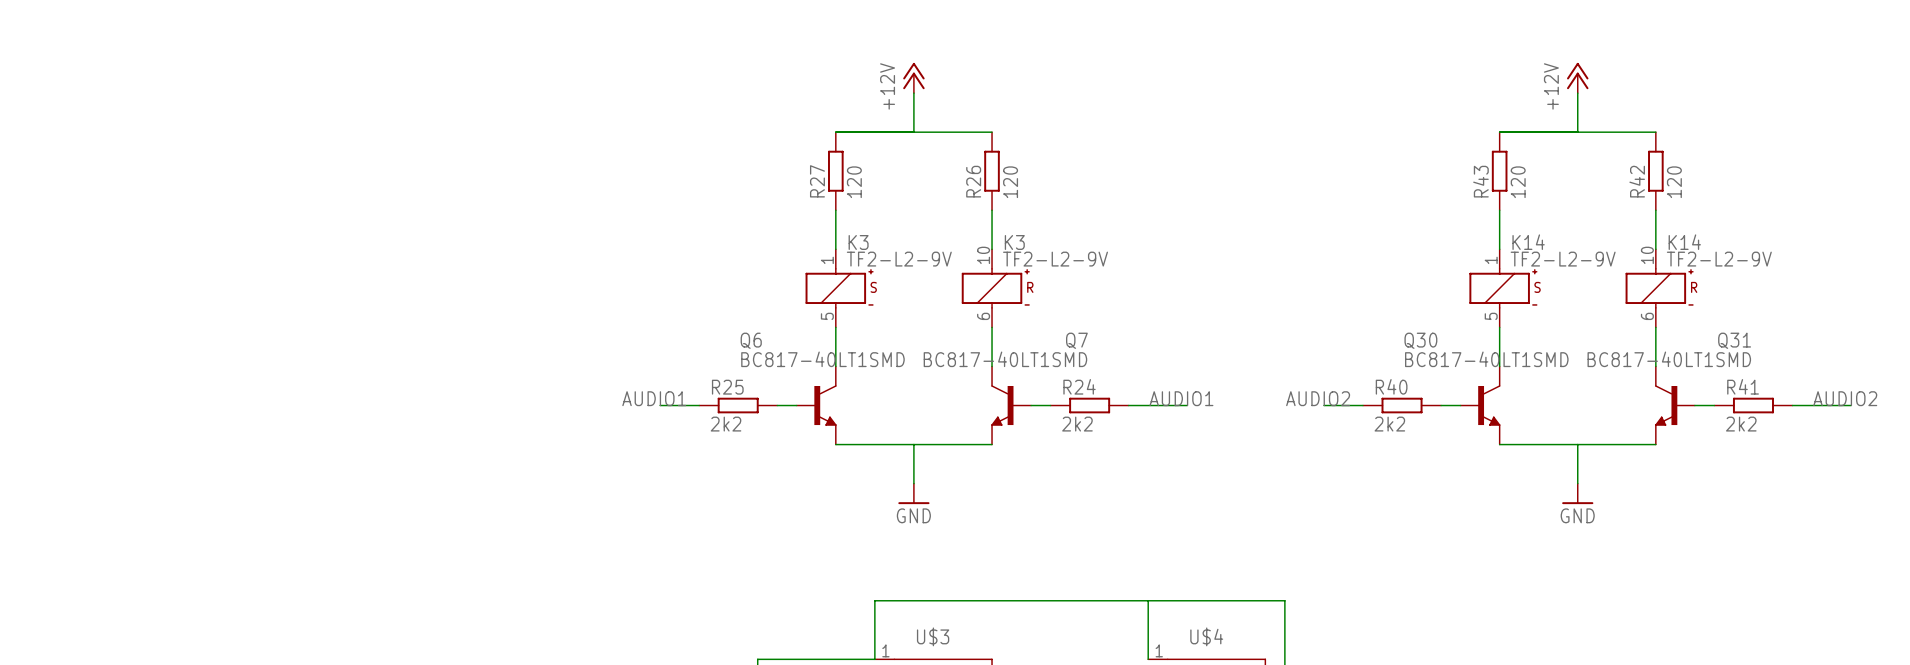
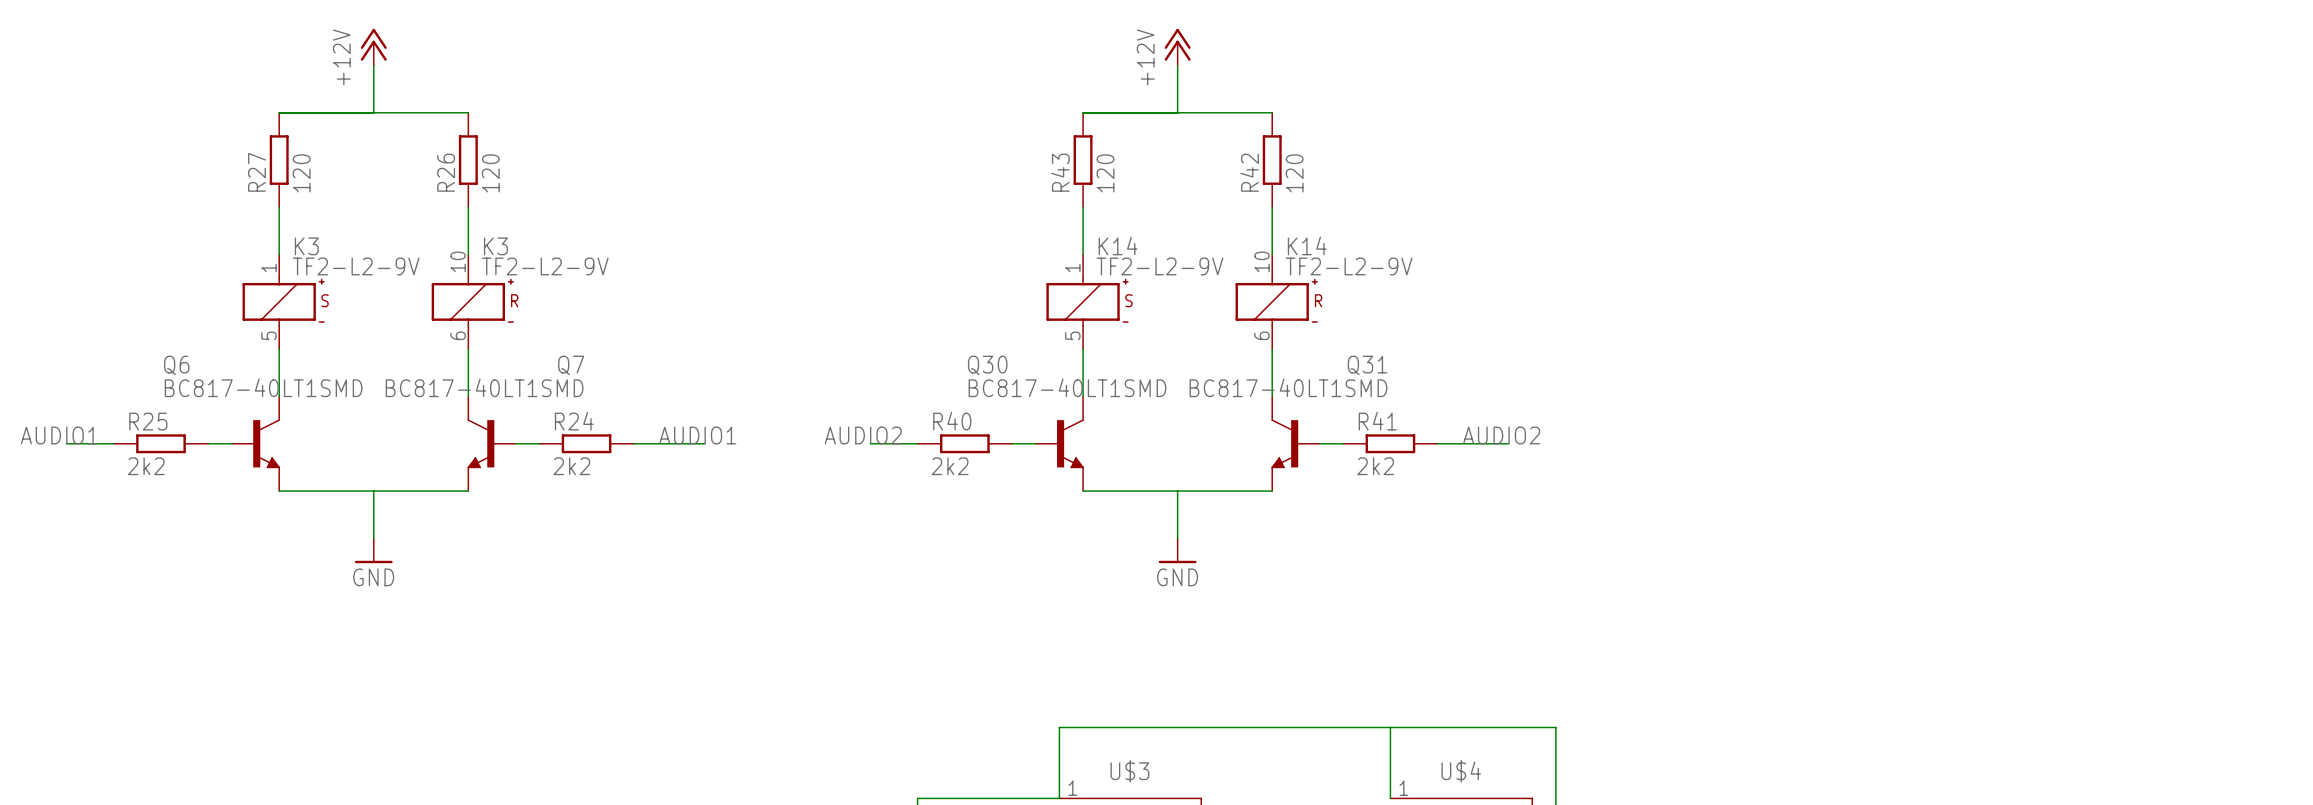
power symbol: none -> +12V (373, 47)
wire: none -> (373, 65) (373, 112)
power symbol position: +12V (913, 78) -> +12V (1177, 47)
power symbol: +12V (1577, 78) -> none
wire: none -> (279, 112) (468, 112)
wire: (913, 93) (913, 132) -> (1177, 65) (1177, 112)
wire: (1577, 93) (1577, 132) -> none
wire: (835, 132) (992, 132) -> (1083, 112) (1272, 112)
wire: (1499, 132) (1655, 132) -> none
wire: none -> (279, 207) (279, 254)
wire: none -> (468, 207) (468, 254)
R27 position: (835, 171) -> (279, 160)
R26 position: (992, 171) -> (468, 160)
R43 position: (1499, 171) -> (1083, 160)
R42 position: (1655, 171) -> (1272, 160)
wire: (835, 210) (835, 249) -> (1083, 207) (1083, 254)
wire: (992, 210) (992, 249) -> (1272, 207) (1272, 254)
wire: (1499, 210) (1499, 249) -> none
wire: (1655, 210) (1655, 249) -> none
K3: none -> TF2-L2-9V (283, 301)
K3: none -> TF2-L2-9V (472, 301)
K14: none -> TF2-L2-9V (1087, 301)
K14: none -> TF2-L2-9V (1276, 301)
wire: none -> (279, 349) (279, 396)
wire: none -> (468, 349) (468, 396)
K3: TF2-L2-9V (839, 288) -> none
wire: none -> (1083, 349) (1083, 396)
K3: TF2-L2-9V (995, 288) -> none
K14: TF2-L2-9V (1503, 288) -> none
K14: TF2-L2-9V (1659, 288) -> none
wire: (835, 327) (835, 366) -> (1035, 443) (1012, 443)
wire: (992, 327) (992, 366) -> (1272, 349) (1272, 396)
wire: (1499, 327) (1499, 366) -> none
wire: (1655, 327) (1655, 366) -> none
label: none -> AUDIO1 (59, 435)
label: none -> AUDIO2 (863, 435)
wire: none -> (66, 443) (113, 443)
wire: none -> (208, 443) (231, 443)
wire: none -> (515, 443) (539, 443)
wire: none -> (633, 443) (704, 443)
wire: none -> (1319, 443) (1343, 443)
label position: AUDIO1 (654, 398) -> AUDIO1 (697, 435)
label: AUDIO1 (1181, 398) -> none
label position: AUDIO2 (1318, 398) -> AUDIO2 (1501, 435)
label: AUDIO2 (1845, 398) -> none
wire: none -> (279, 491) (468, 491)
wire: none -> (373, 491) (373, 538)
wire: (660, 405) (699, 405) -> (870, 443) (917, 443)
R25 position: (738, 405) -> (160, 443)
wire: (777, 405) (796, 405) -> none
Q6 position: (816, 405) -> (255, 443)
wire: none -> (1083, 491) (1248, 491)
Q7 position: (1011, 405) -> (491, 443)
R24 position: (1089, 405) -> (586, 443)
wire: (1128, 405) (1187, 405) -> (1437, 443) (1508, 443)
wire: (1323, 405) (1362, 405) -> none
R40 position: (1402, 405) -> (964, 443)
wire: (1441, 405) (1460, 405) -> none
Q30 position: (1480, 405) -> (1059, 443)
Q31 position: (1675, 405) -> (1295, 443)
wire: (1694, 405) (1714, 405) -> none
R41 position: (1753, 405) -> (1390, 443)
wire: (1792, 405) (1851, 405) -> none
wire: (835, 444) (992, 444) -> none
wire: (913, 444) (913, 483) -> (1177, 491) (1177, 538)
wire: (1499, 444) (1655, 444) -> none
wire: (1577, 444) (1577, 483) -> none
power symbol: none -> GND (373, 550)
power symbol position: GND (913, 493) -> GND (1177, 550)
power symbol: GND (1577, 493) -> none

